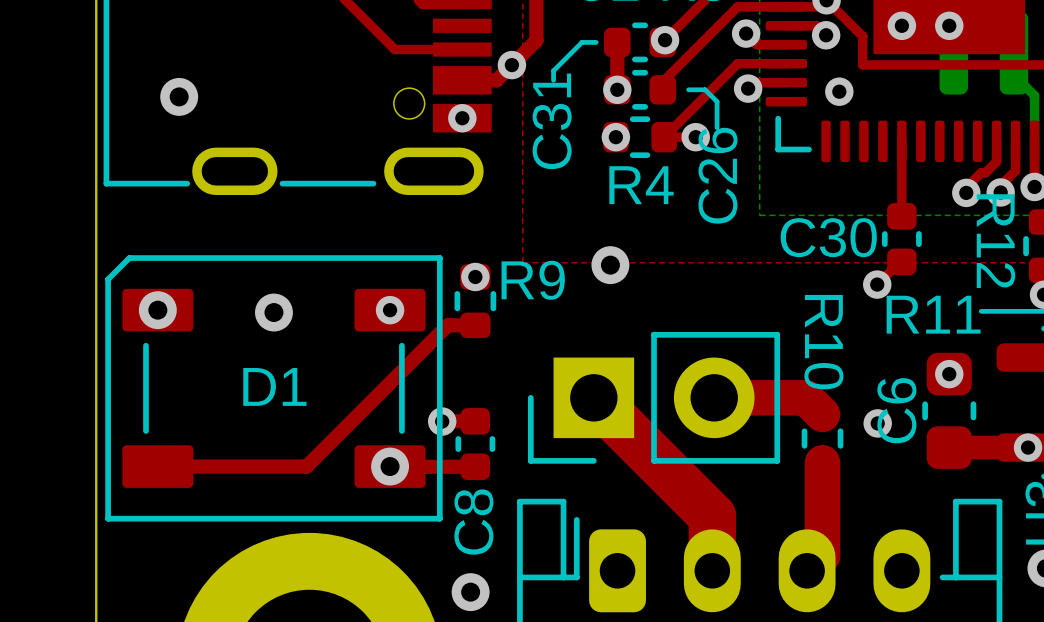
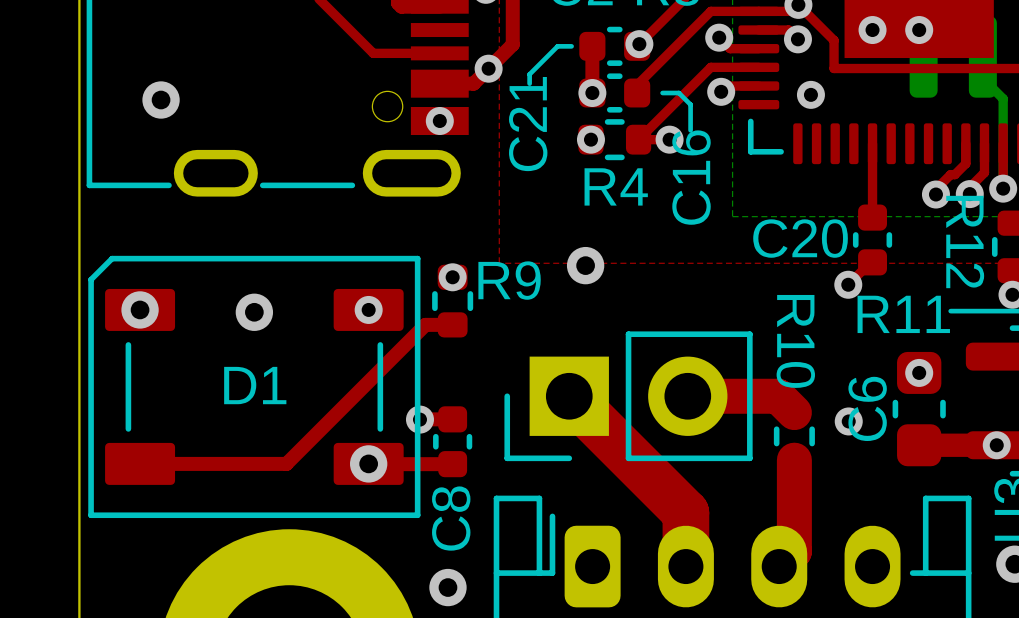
C31 name: C31 (552, 121) -> C21 (528, 124)
C26 name: C26 (718, 175) -> C16 (691, 177)
C30 name: C30 (828, 237) -> C20 (800, 238)

